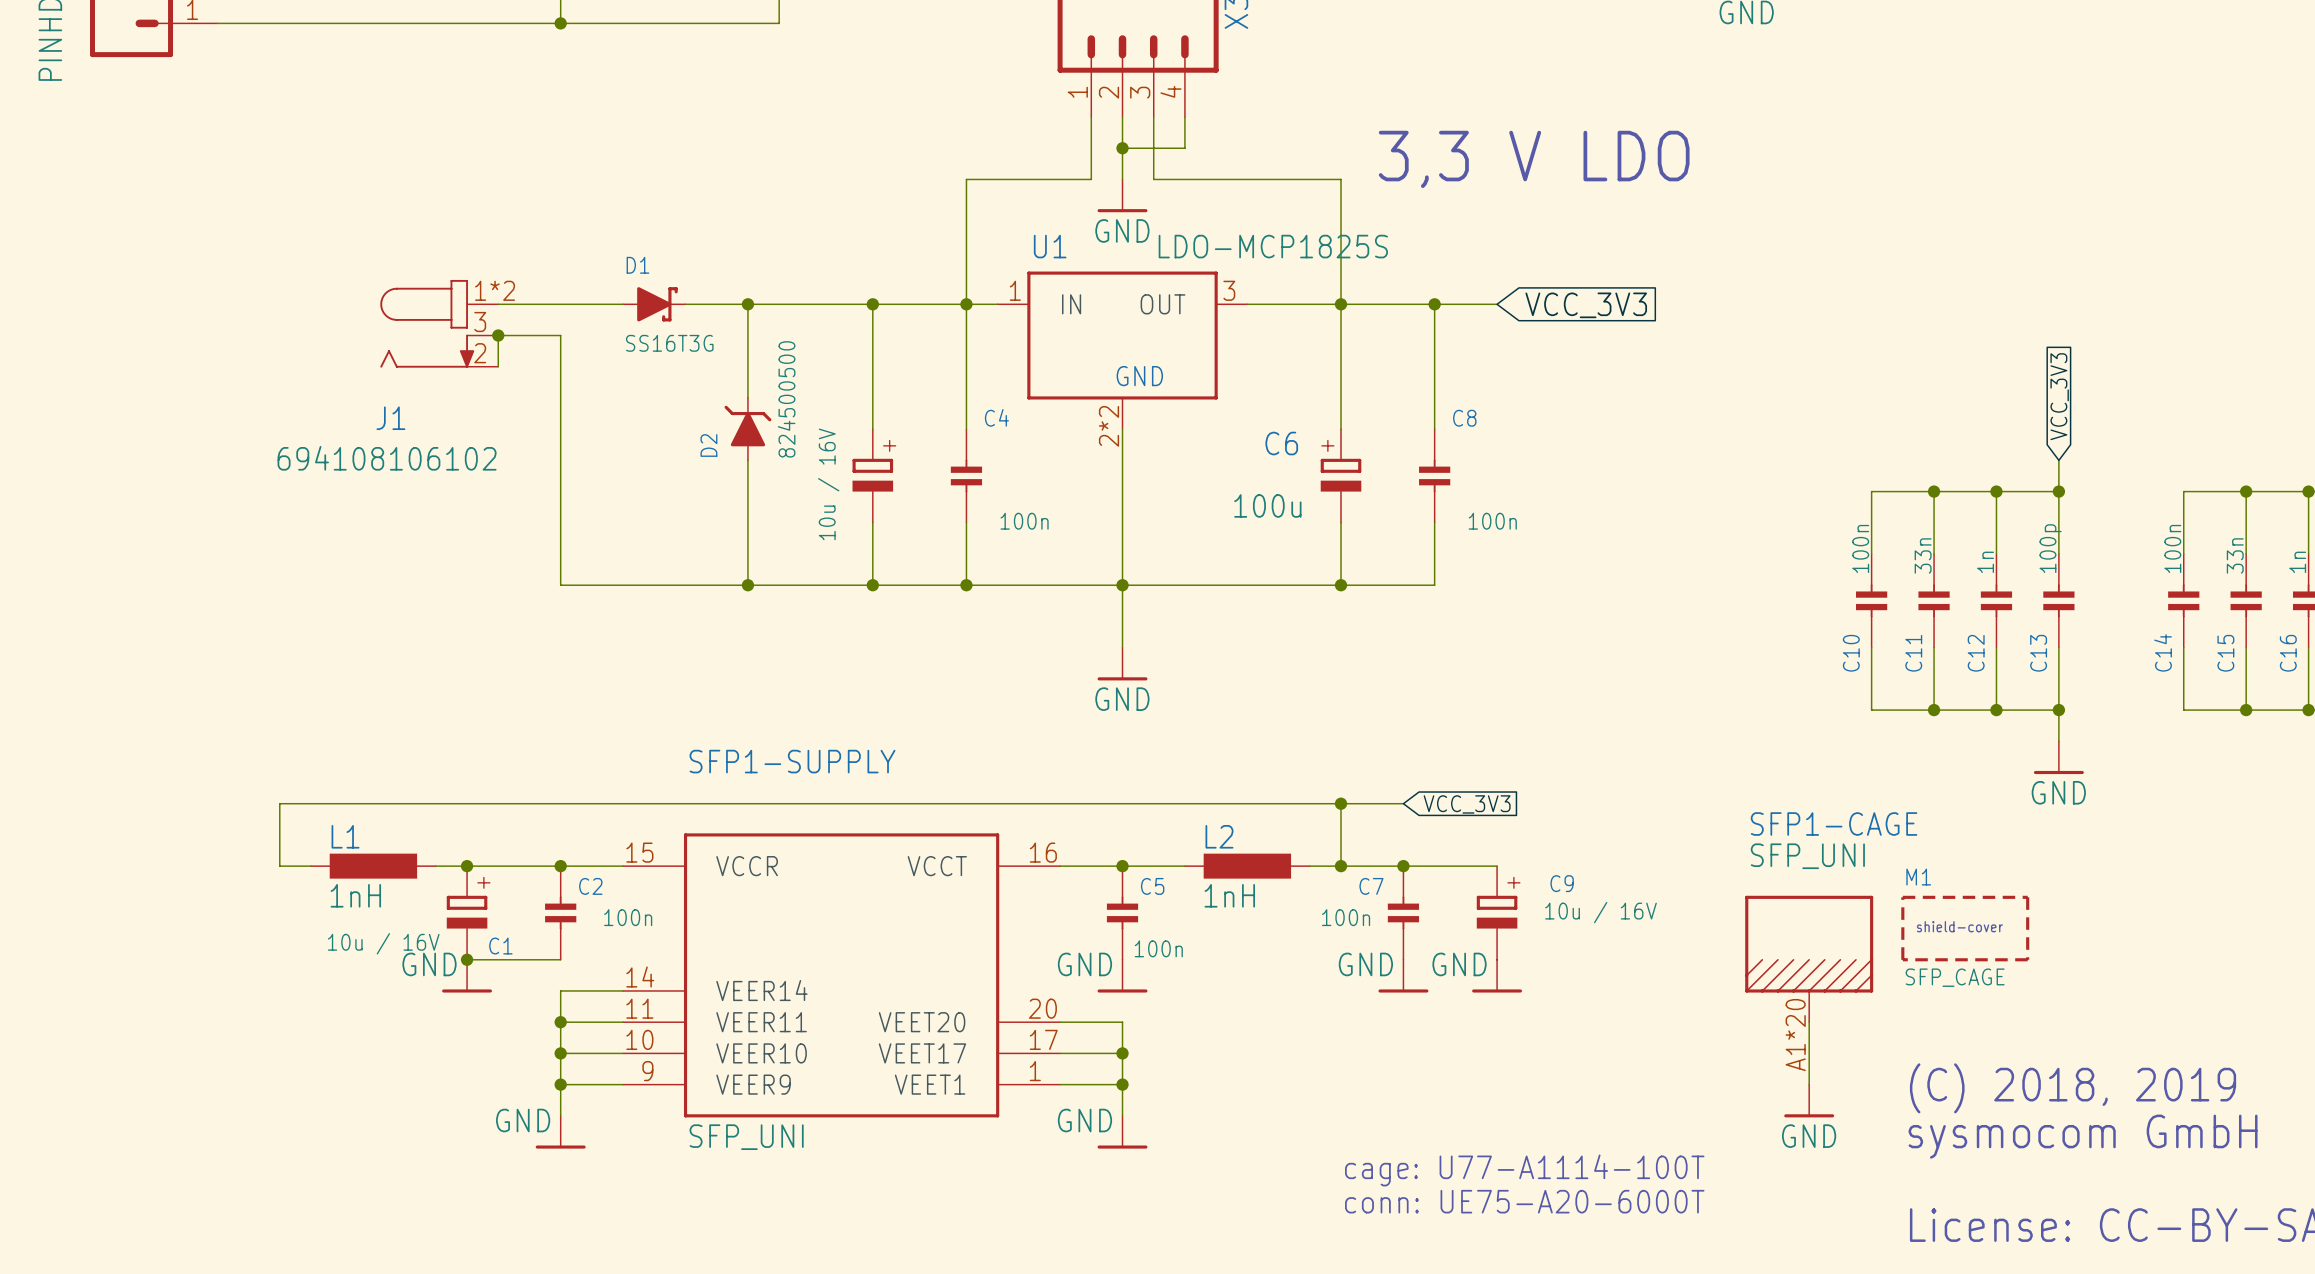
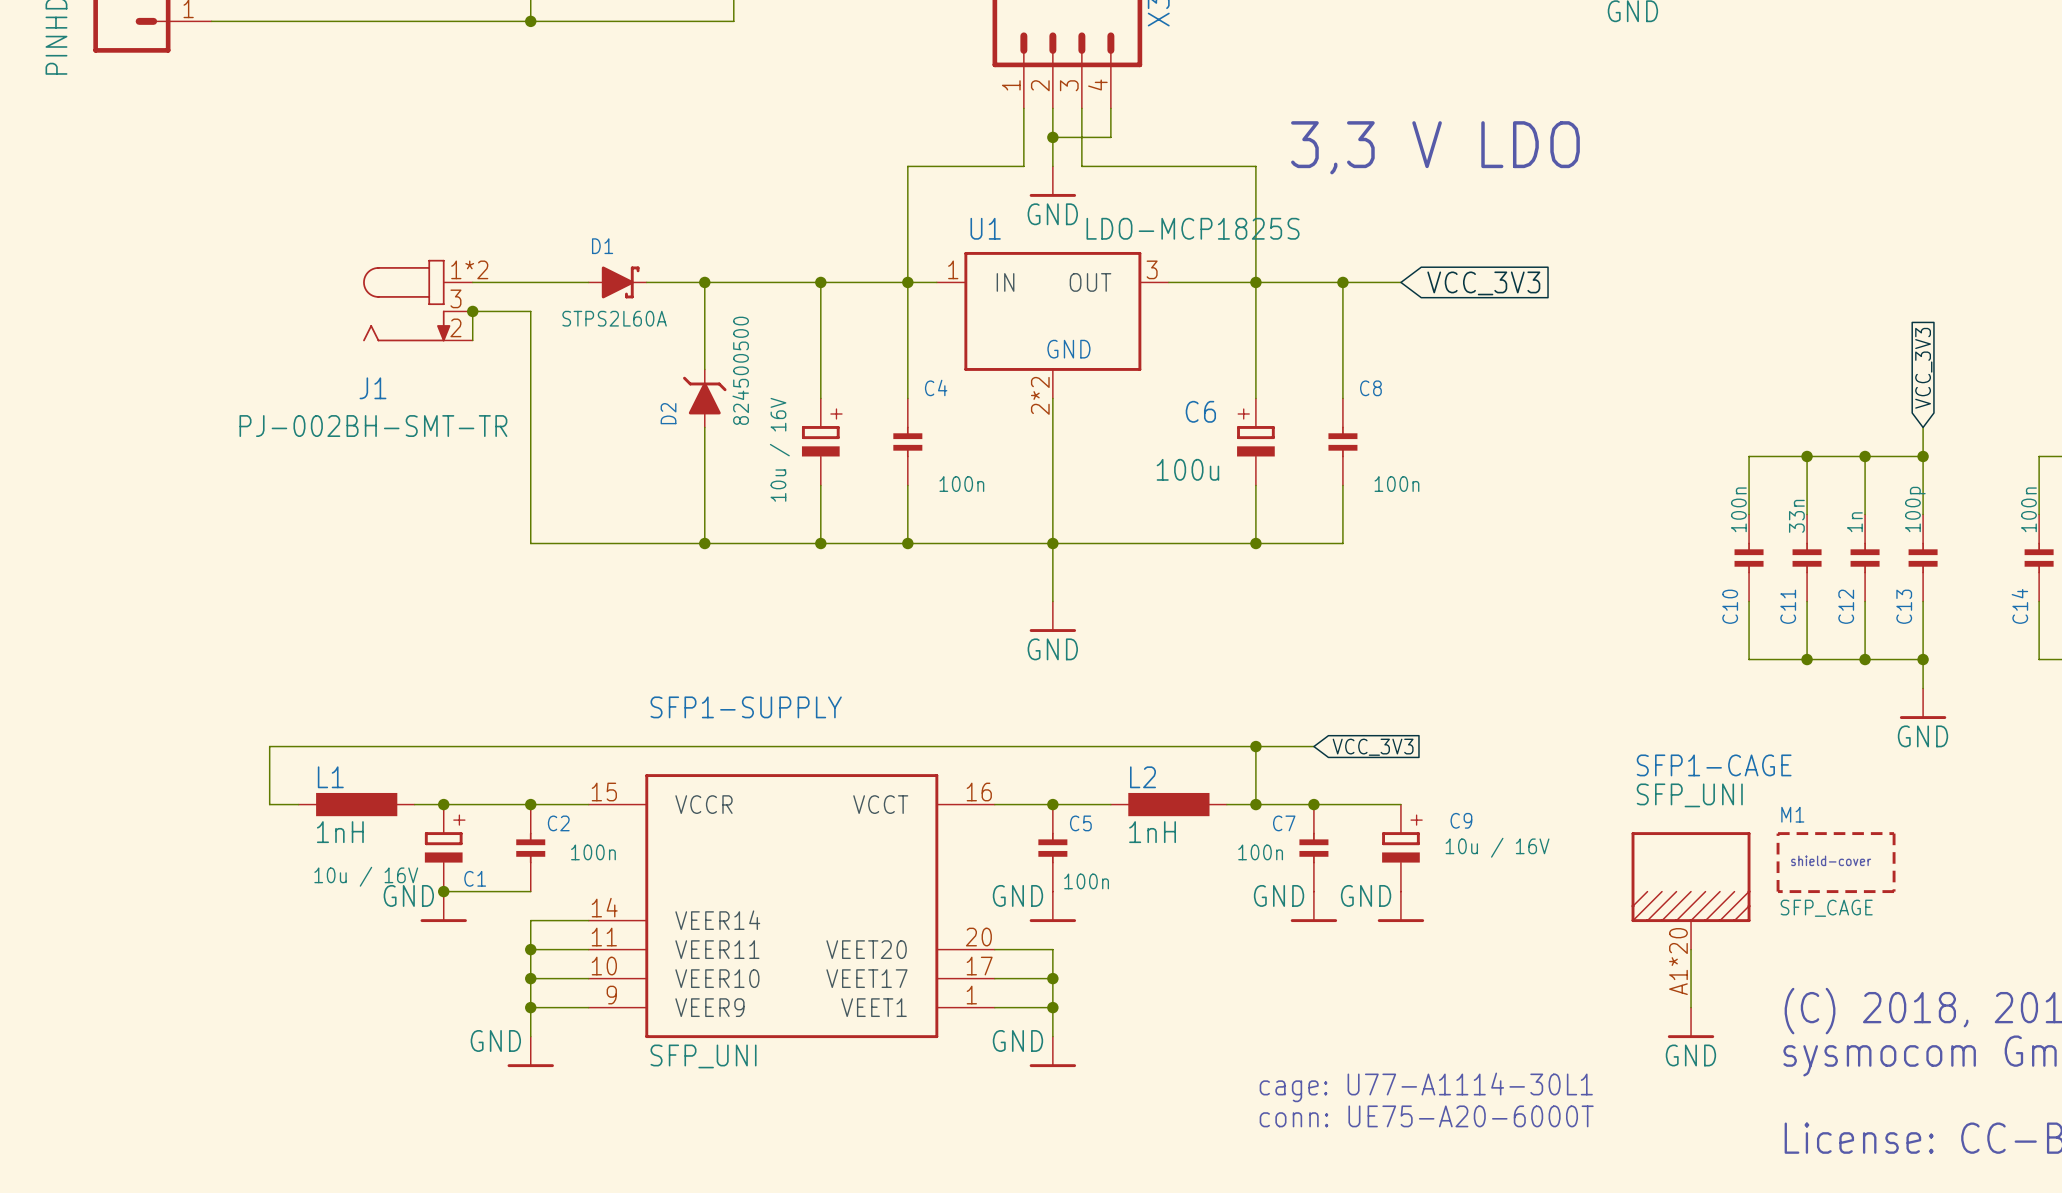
D1 value: SS16T3G (669, 343) -> STPS2L60A (614, 318)
J1 value: 694108106102 (387, 458) -> PJ-002BH-SMT-TR (373, 426)
text: cage: U77-A1114-100T (1524, 1170) -> cage: U77-A1114-30L1 (1426, 1087)

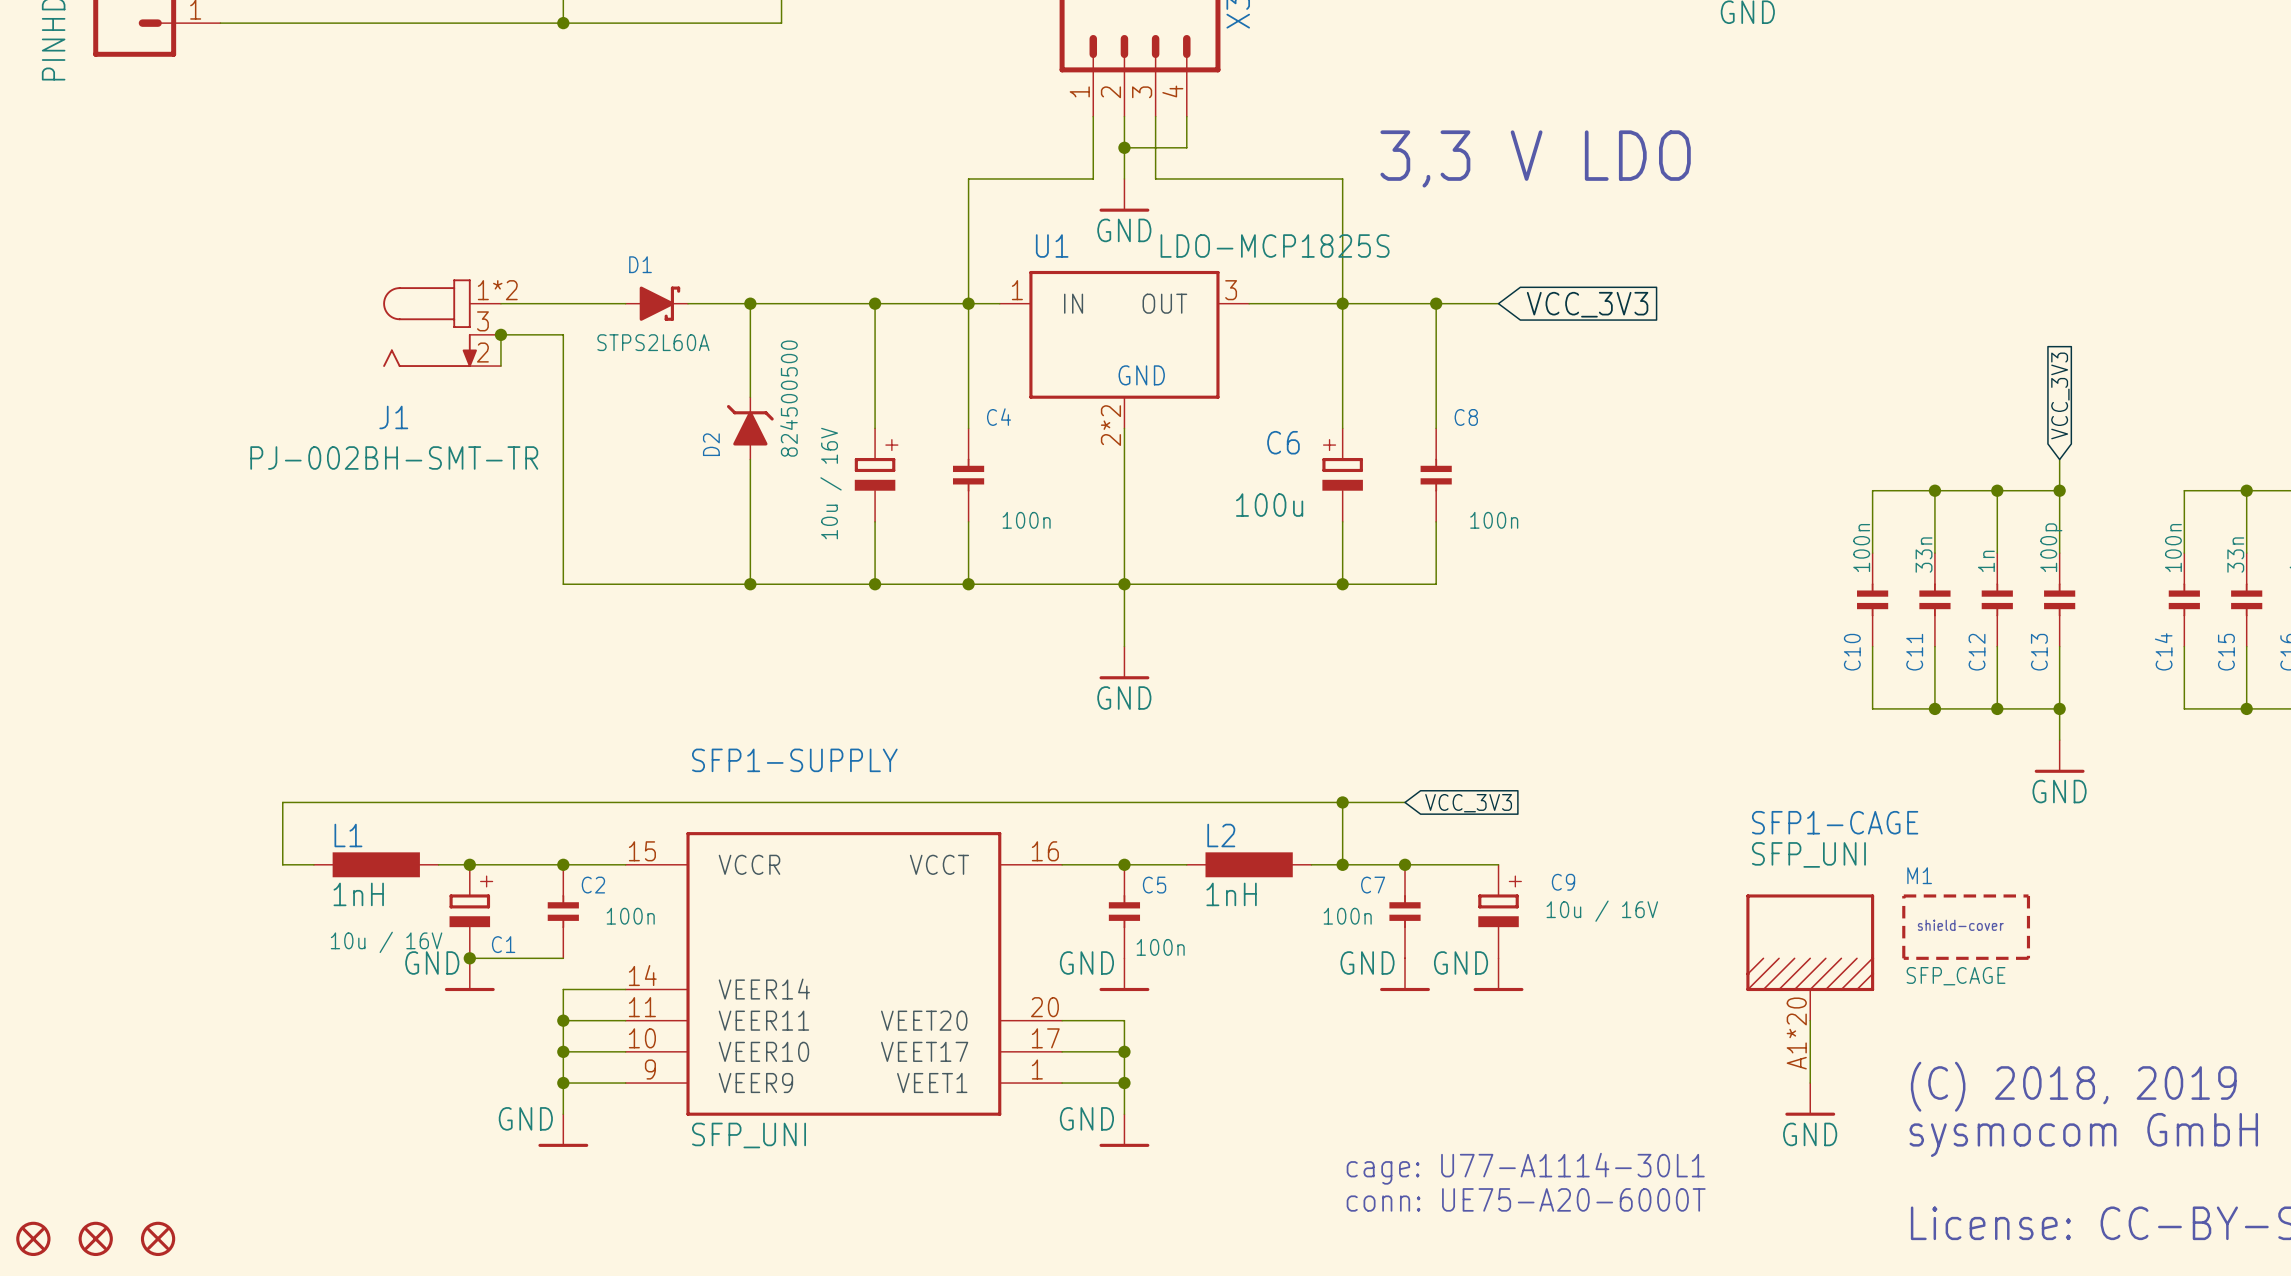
part: none -> (33, 1238)
part: none -> (95, 1238)
part: none -> (158, 1238)

